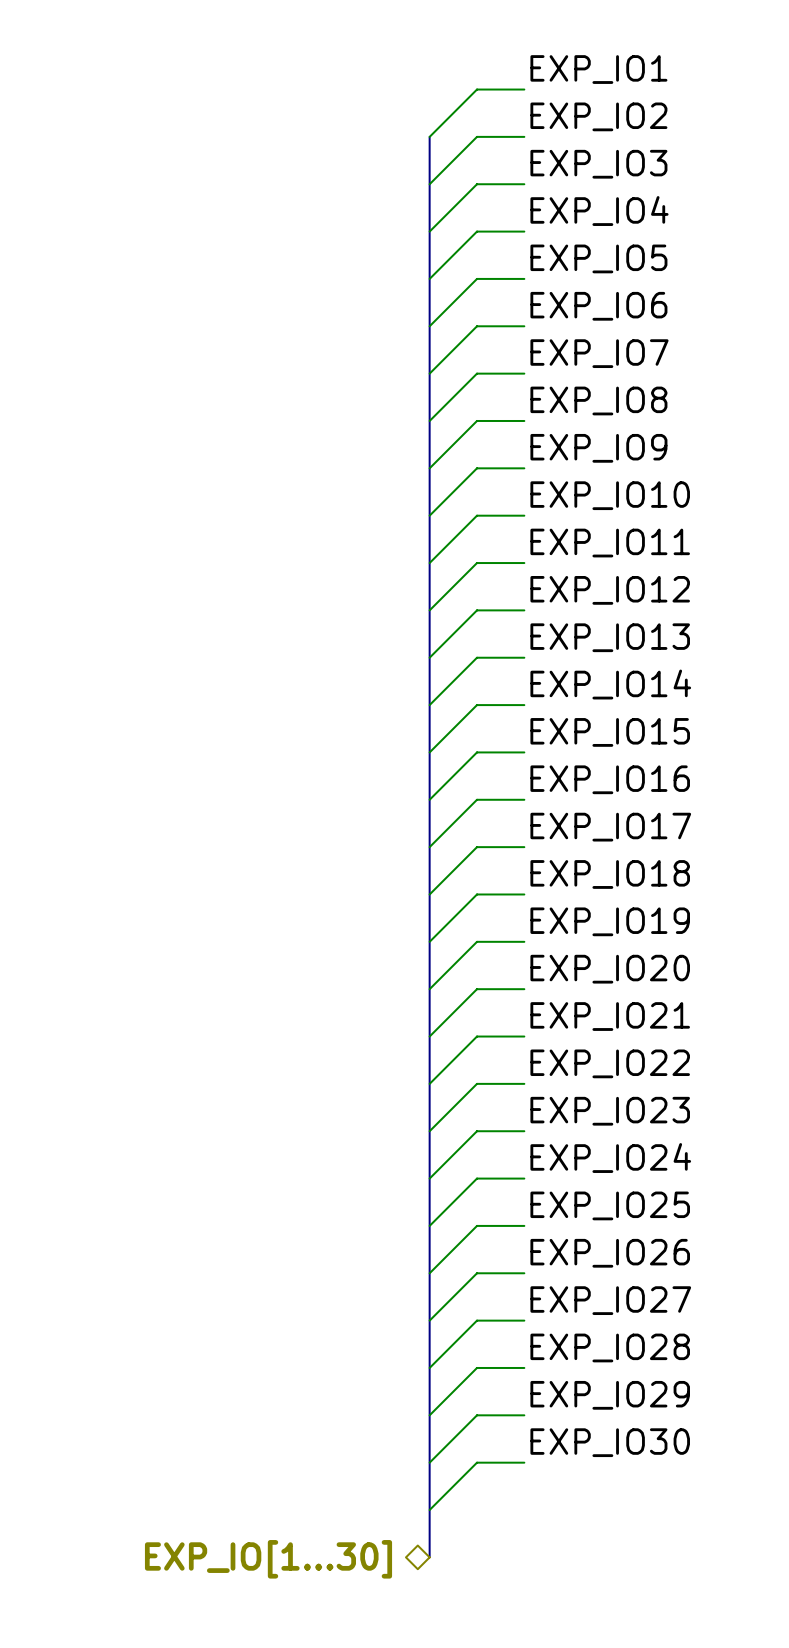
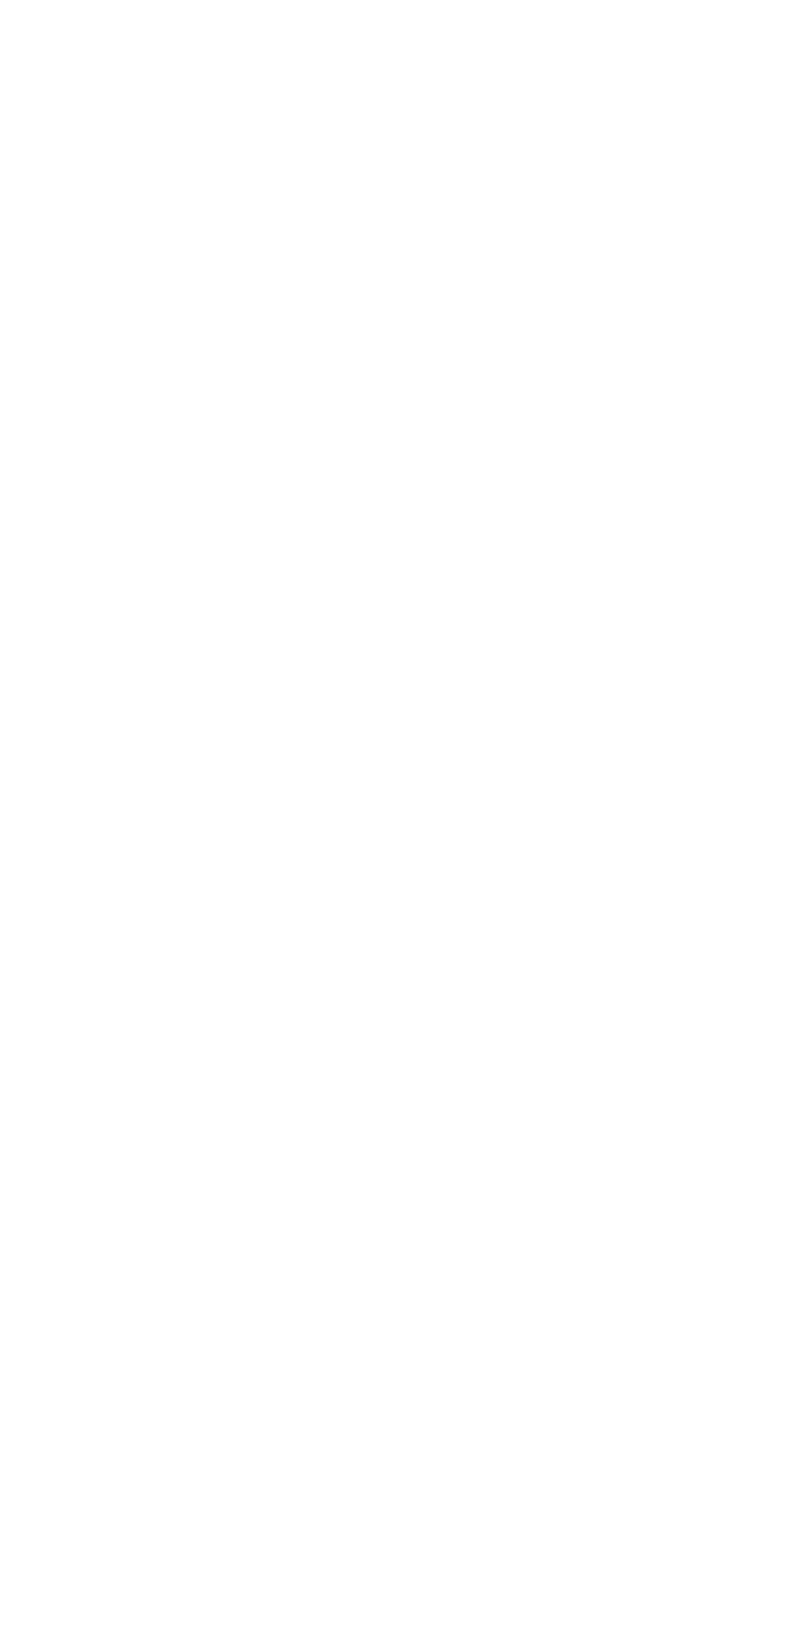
label: EXP_IO1 (598, 69) -> none
wire: (524, 89) (476, 89) (429, 136) -> none
label: EXP_IO2 (598, 116) -> none
bus: (429, 136) (429, 1557) -> none
wire: (524, 136) (476, 136) (429, 184) -> none
label: EXP_IO3 (598, 164) -> none
wire: (524, 184) (476, 184) (429, 231) -> none
label: EXP_IO4 (599, 211) -> none
wire: (524, 231) (476, 231) (429, 278) -> none
label: EXP_IO5 (598, 258) -> none
wire: (524, 278) (476, 278) (429, 326) -> none
label: EXP_IO6 (598, 306) -> none
wire: (524, 326) (476, 326) (429, 373) -> none
label: EXP_IO7 (599, 353) -> none
wire: (524, 373) (476, 373) (429, 420) -> none
label: EXP_IO8 (598, 400) -> none
wire: (524, 420) (476, 420) (429, 468) -> none
label: EXP_IO9 (598, 448) -> none
wire: (524, 468) (476, 468) (429, 515) -> none
label: EXP_IO10 (610, 495) -> none
wire: (524, 515) (476, 515) (429, 563) -> none
label: EXP_IO11 (610, 543) -> none
wire: (524, 563) (476, 563) (429, 610) -> none
label: EXP_IO12 (610, 590) -> none
wire: (524, 610) (476, 610) (429, 657) -> none
label: EXP_IO13 (610, 637) -> none
wire: (524, 657) (476, 657) (429, 705) -> none
label: EXP_IO14 (610, 684) -> none
wire: (524, 705) (476, 705) (429, 752) -> none
label: EXP_IO15 (610, 732) -> none
wire: (524, 752) (476, 752) (429, 799) -> none
label: EXP_IO16 (610, 779) -> none
wire: (524, 799) (476, 799) (429, 847) -> none
label: EXP_IO17 (610, 827) -> none
wire: (524, 847) (476, 847) (429, 894) -> none
label: EXP_IO18 (610, 874) -> none
wire: (524, 894) (476, 894) (429, 941) -> none
label: EXP_IO19 (610, 921) -> none
wire: (524, 941) (476, 941) (429, 989) -> none
label: EXP_IO20 (610, 969) -> none
wire: (524, 989) (476, 989) (429, 1036) -> none
label: EXP_IO21 (610, 1016) -> none
wire: (524, 1036) (476, 1036) (429, 1083) -> none
label: EXP_IO22 (610, 1063) -> none
wire: (524, 1083) (476, 1083) (429, 1131) -> none
label: EXP_IO23 (610, 1111) -> none
wire: (524, 1131) (476, 1131) (429, 1178) -> none
label: EXP_IO24 (610, 1158) -> none
wire: (524, 1178) (476, 1178) (429, 1225) -> none
label: EXP_IO25 (610, 1205) -> none
wire: (524, 1225) (476, 1225) (429, 1273) -> none
label: EXP_IO26 (610, 1253) -> none
wire: (524, 1273) (476, 1273) (429, 1320) -> none
label: EXP_IO27 (610, 1300) -> none
wire: (524, 1320) (476, 1320) (429, 1367) -> none
label: EXP_IO28 (610, 1347) -> none
wire: (524, 1367) (476, 1367) (429, 1415) -> none
label: EXP_IO29 (610, 1395) -> none
wire: (524, 1415) (476, 1415) (429, 1462) -> none
label: EXP_IO30 (610, 1442) -> none
wire: (524, 1462) (476, 1462) (429, 1510) -> none
hierarchical label: EXP_IO[1...30] (268, 1559) -> none

